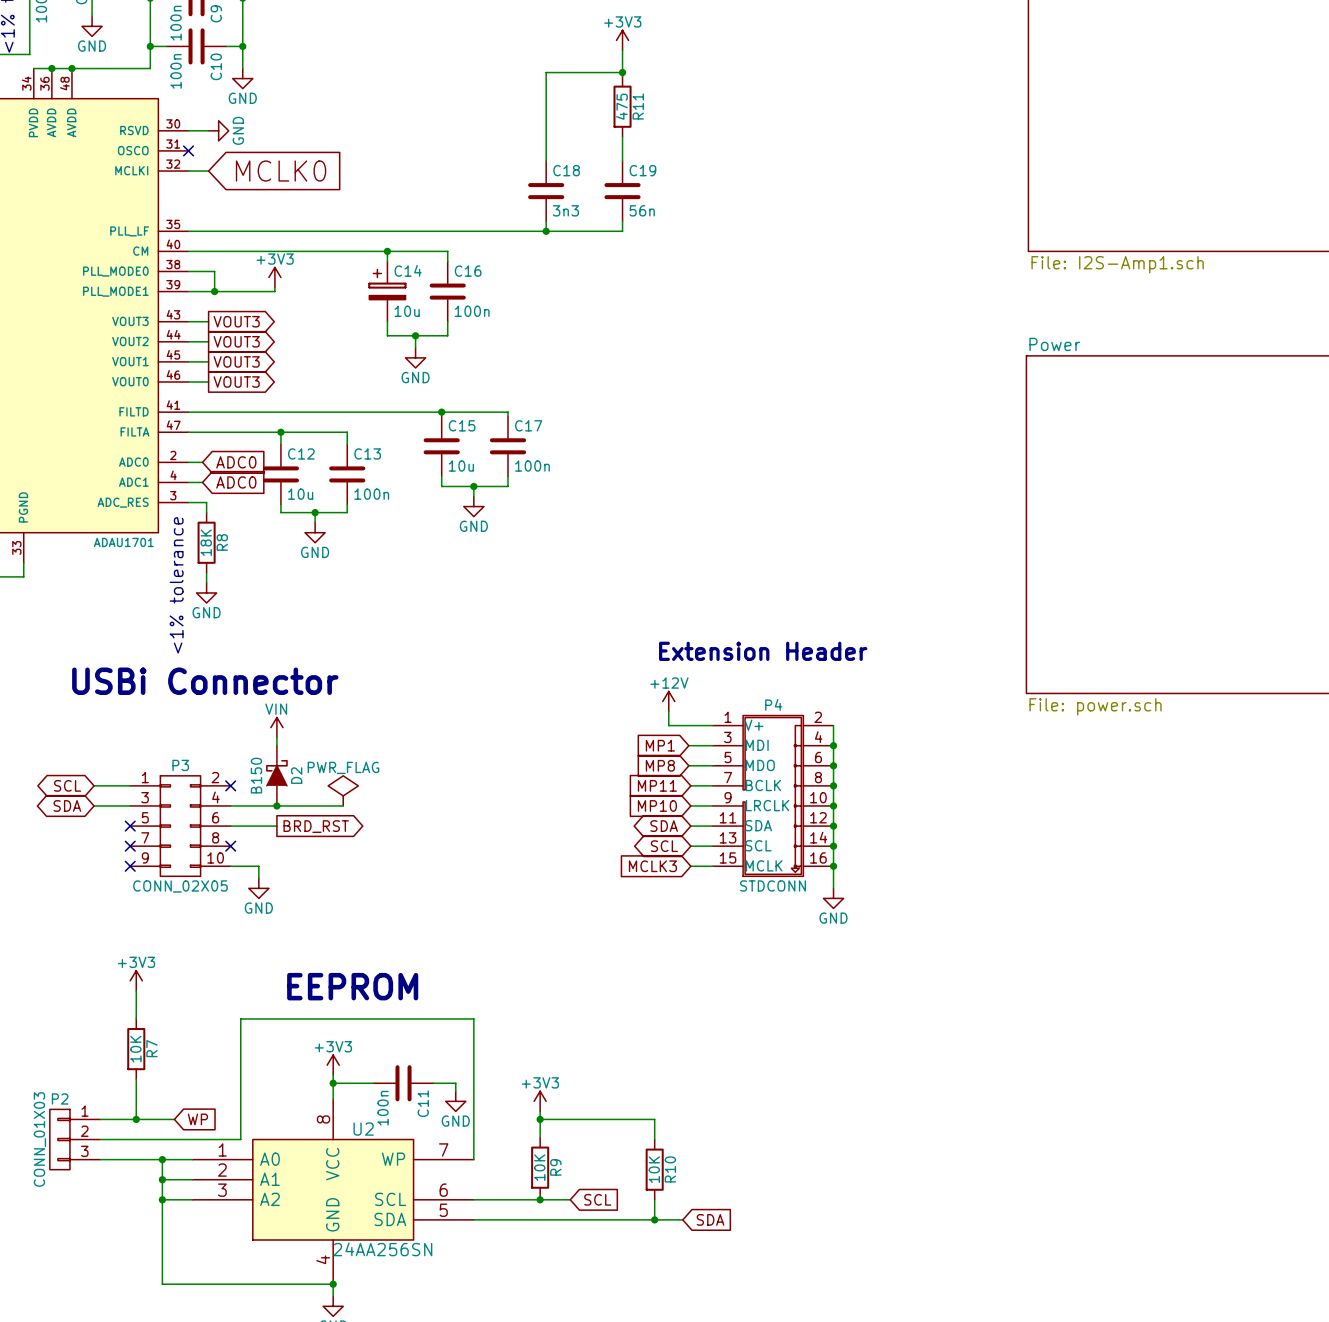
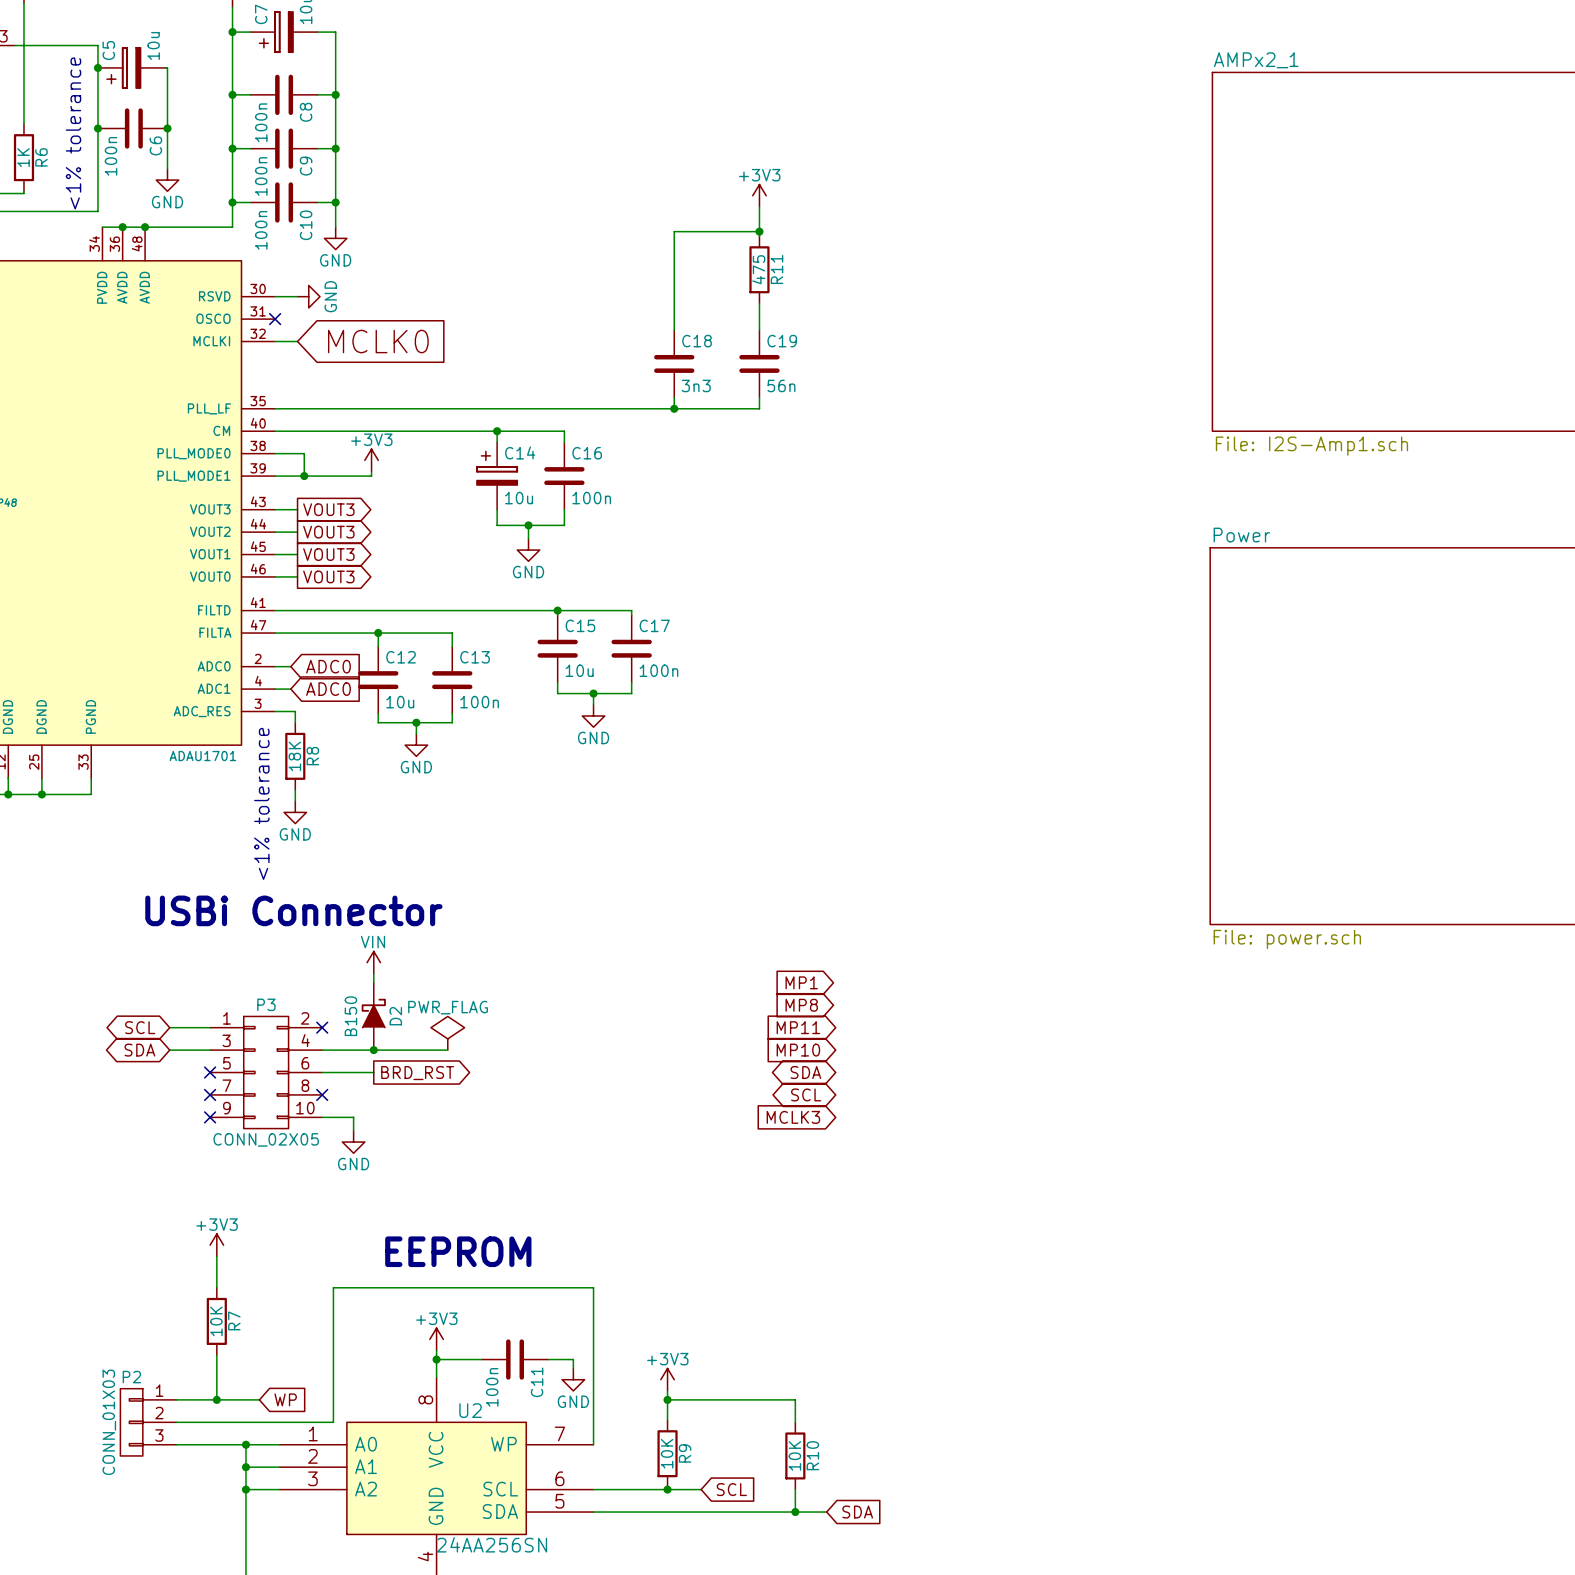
text: Extension Header (763, 651) -> none
power symbol: +12V (668, 701) -> none
wire: (668, 711) (668, 725) (712, 725) -> none
wire: (833, 725) (833, 888) -> none
wire: (688, 745) (712, 745) -> none
junction: (833, 745) -> none
wire: (688, 765) (712, 765) -> none
junction: (833, 765) -> none
wire: (690, 785) (712, 785) -> none
junction: (833, 785) -> none
P4: STDCONN (773, 795) -> none
wire: (690, 805) (712, 805) -> none
junction: (833, 805) -> none
wire: (690, 826) (712, 826) -> none
junction: (833, 826) -> none
wire: (690, 846) (712, 846) -> none
junction: (833, 846) -> none
wire: (690, 866) (712, 866) -> none
junction: (833, 866) -> none
power symbol: GND (833, 898) -> none

